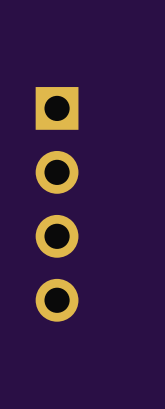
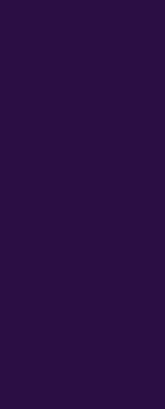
part: (57, 204) -> none

